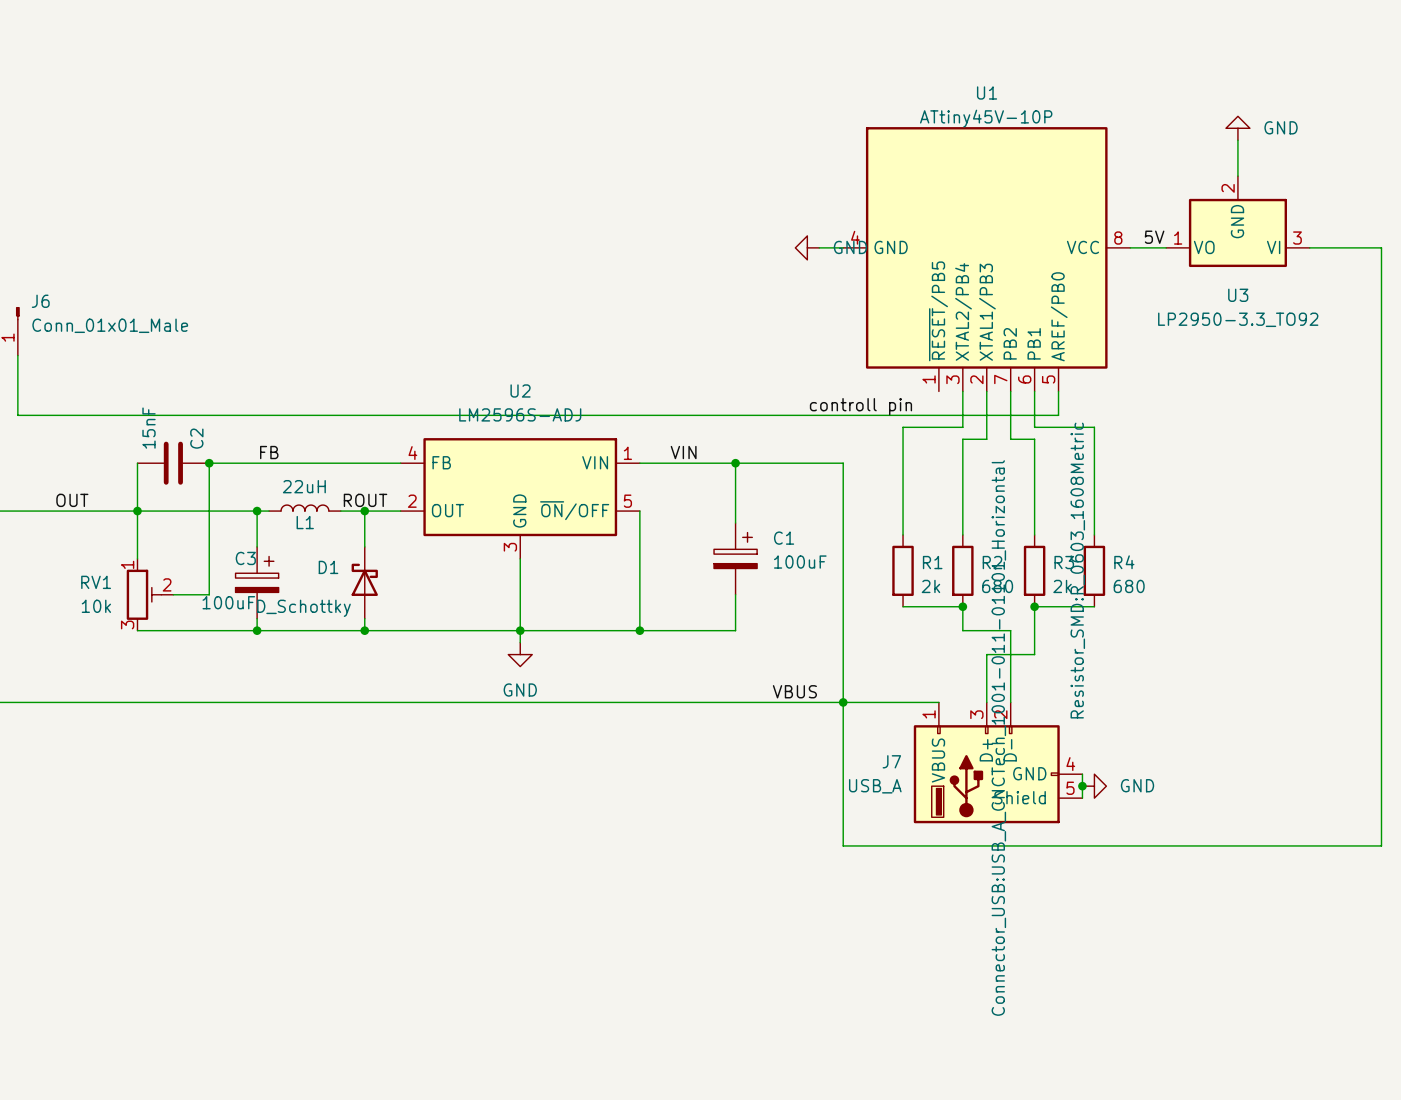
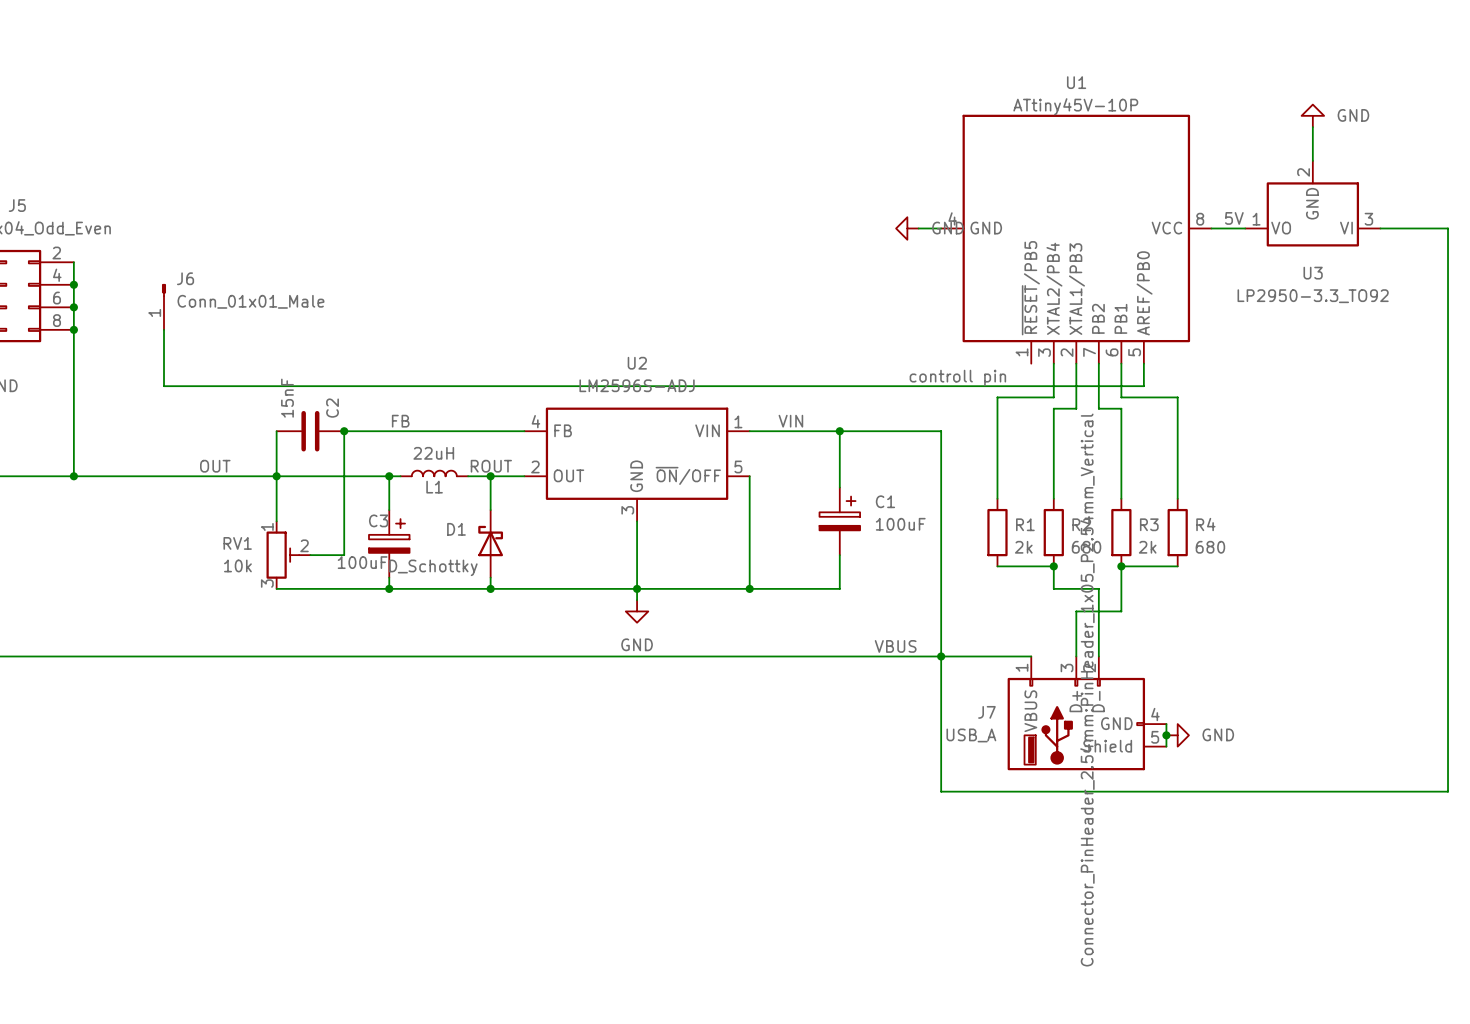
R4 text: Resistor_SMD:R_0603_1608Metric (1077, 570) -> none
J7 text: Connector_USB:USB_A_CNCTech_1001-011-01101_Horizontal (998, 738) -> Connector_PinHeader_2.54mm:PinHeader_1x05_P2.54mm_Vertical (1087, 690)

